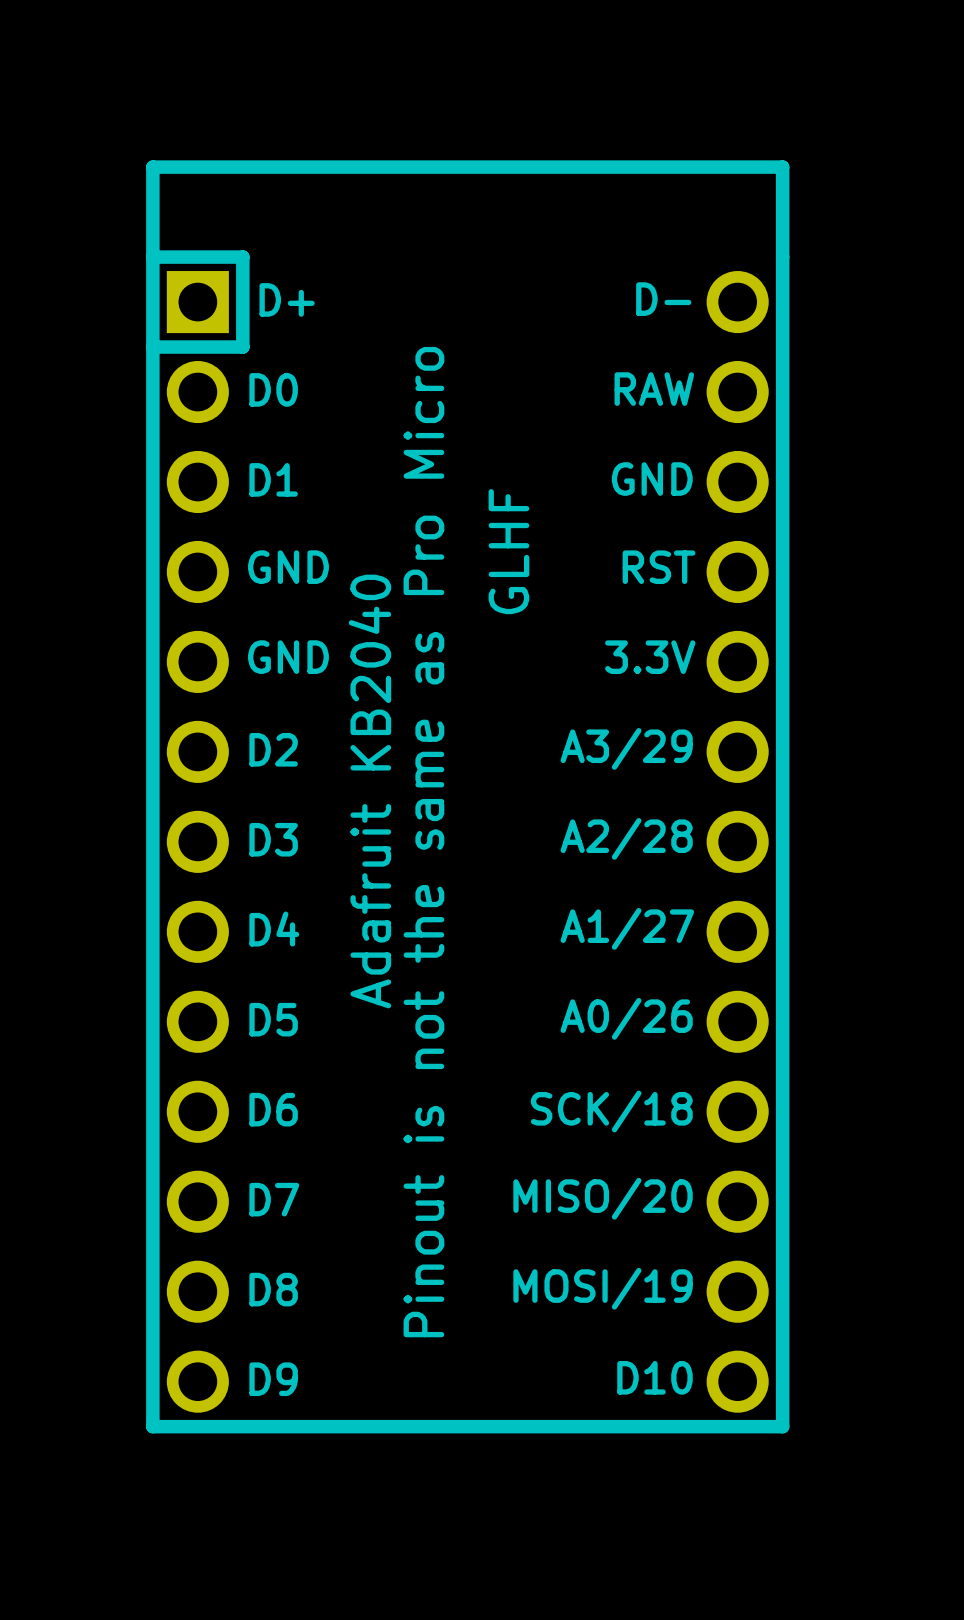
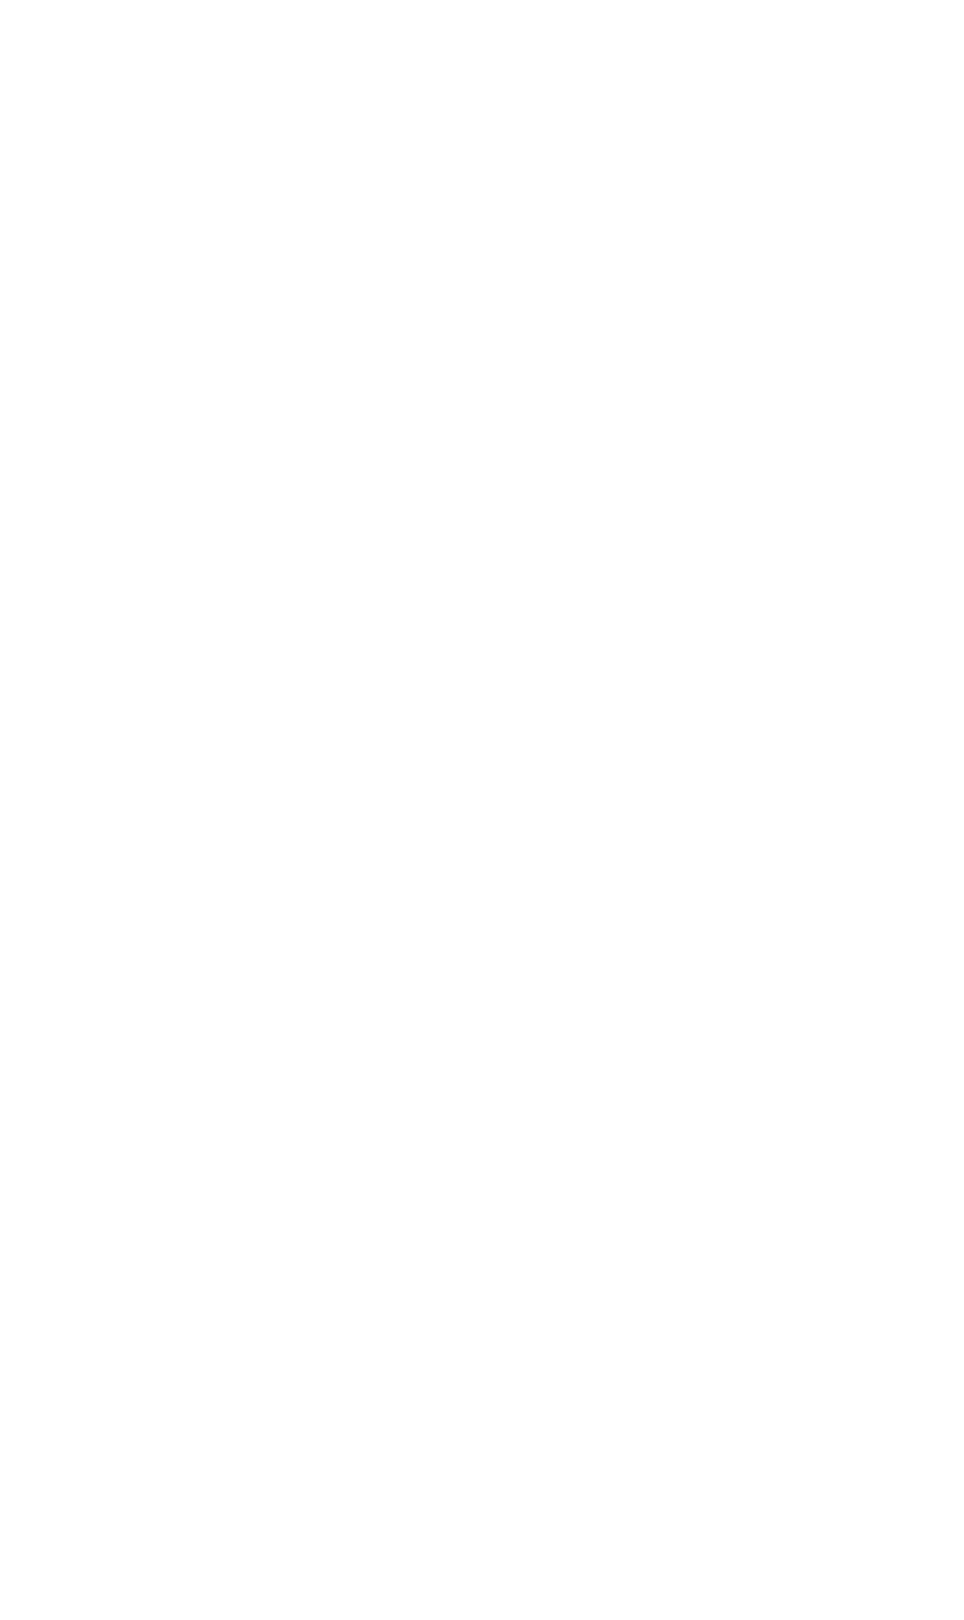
part: (467, 796) -> none

